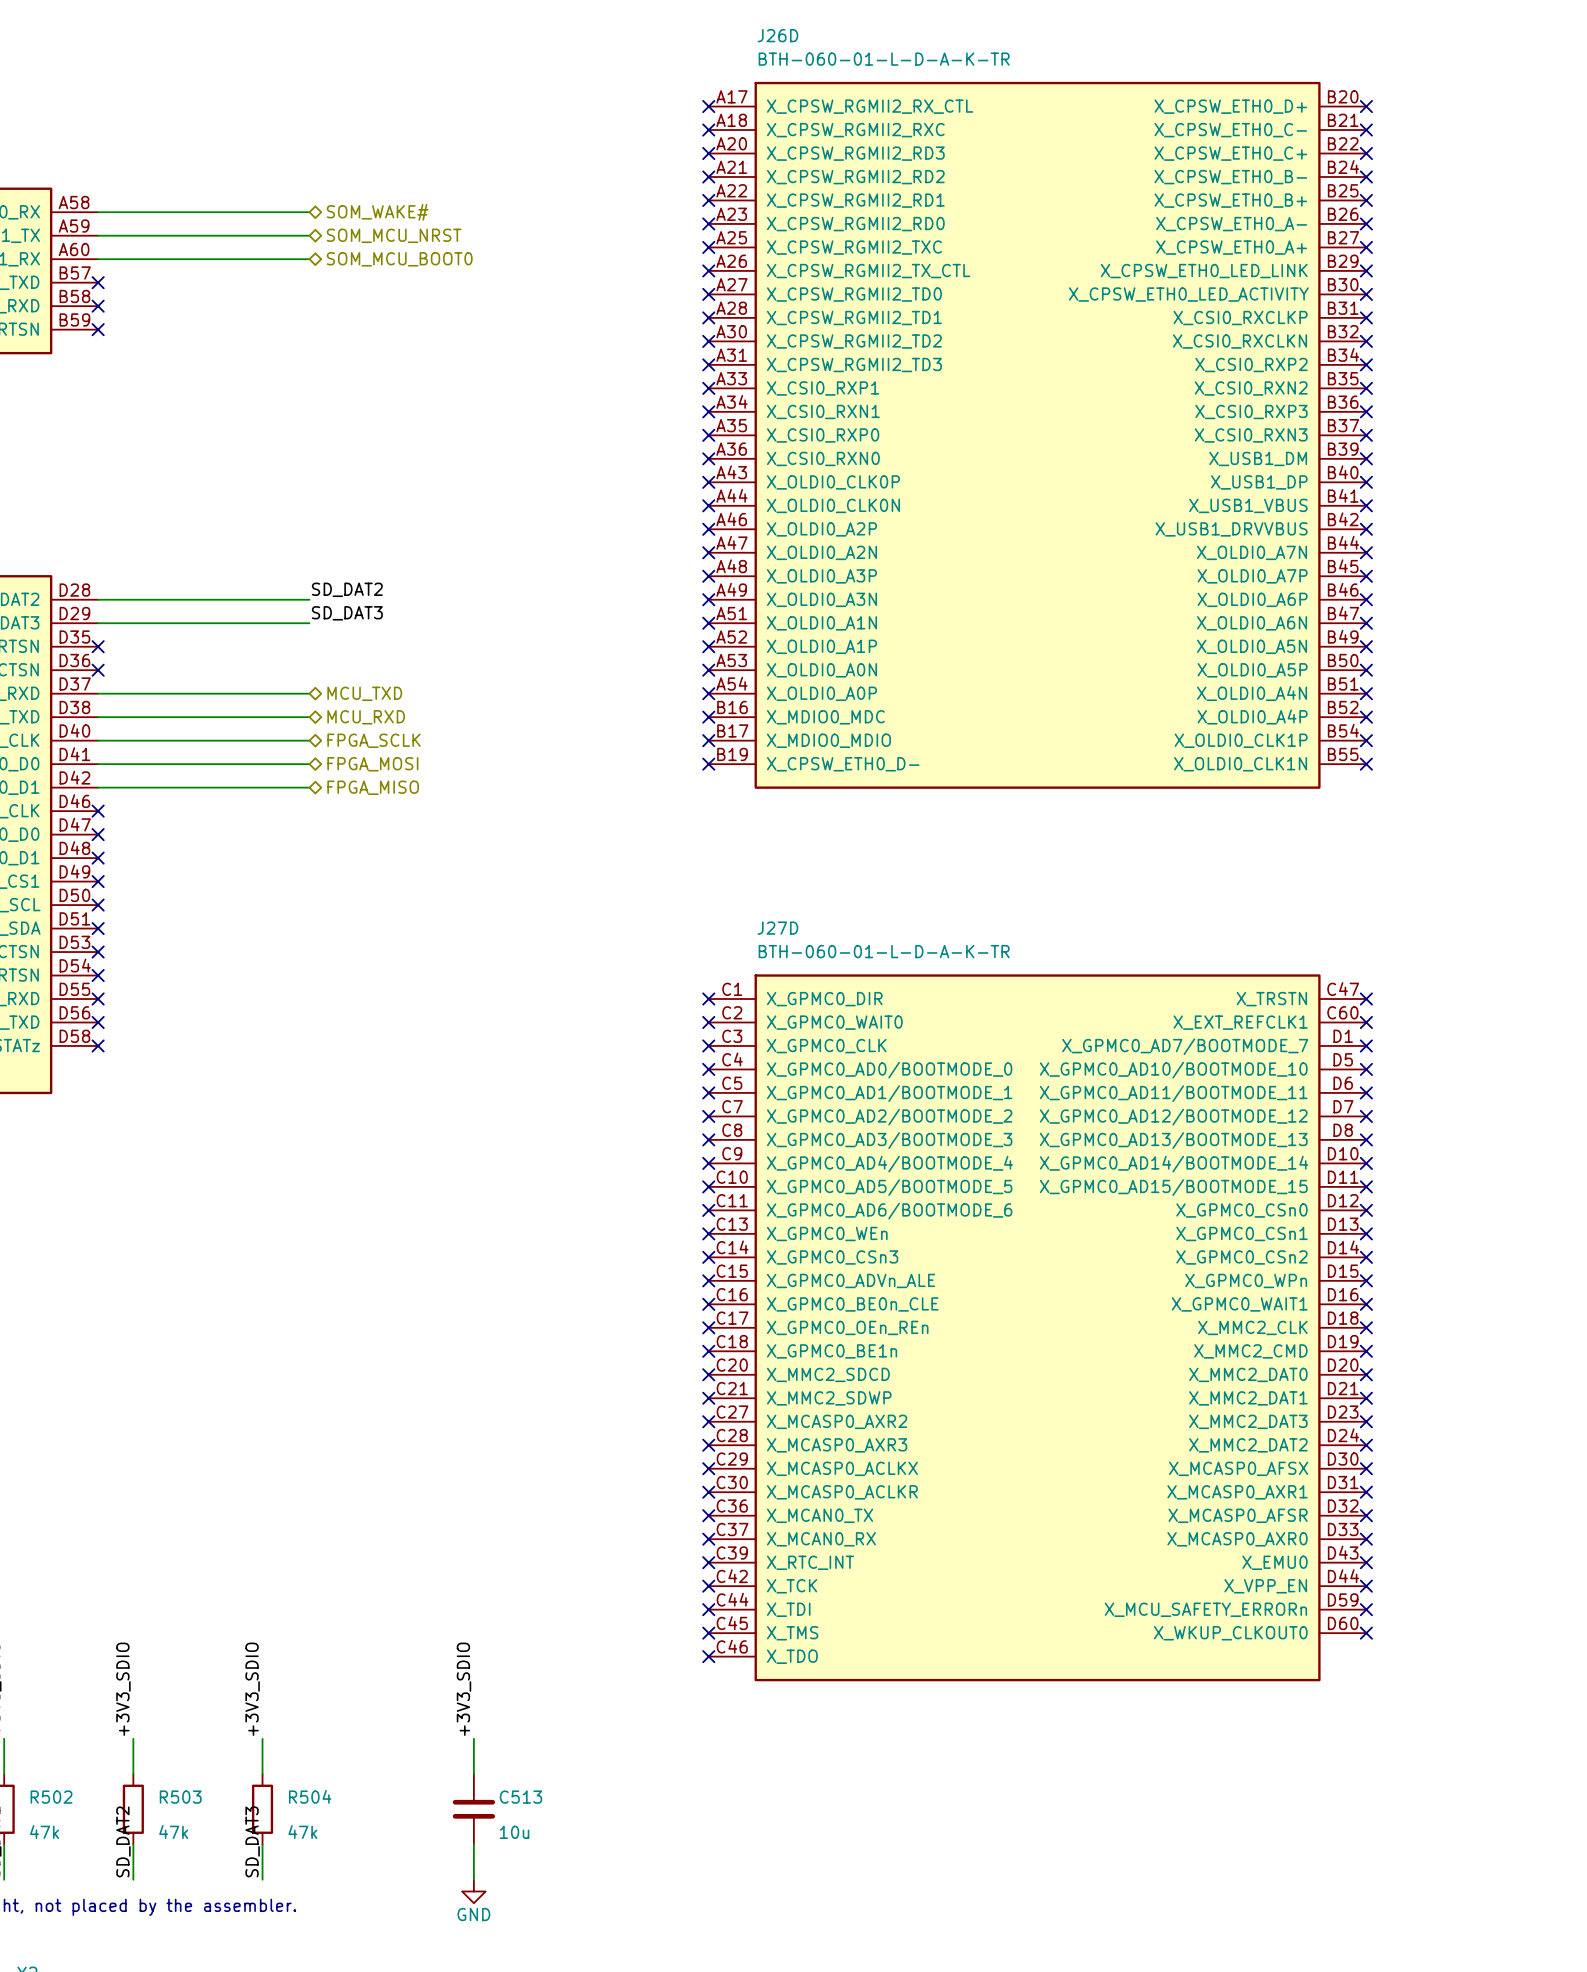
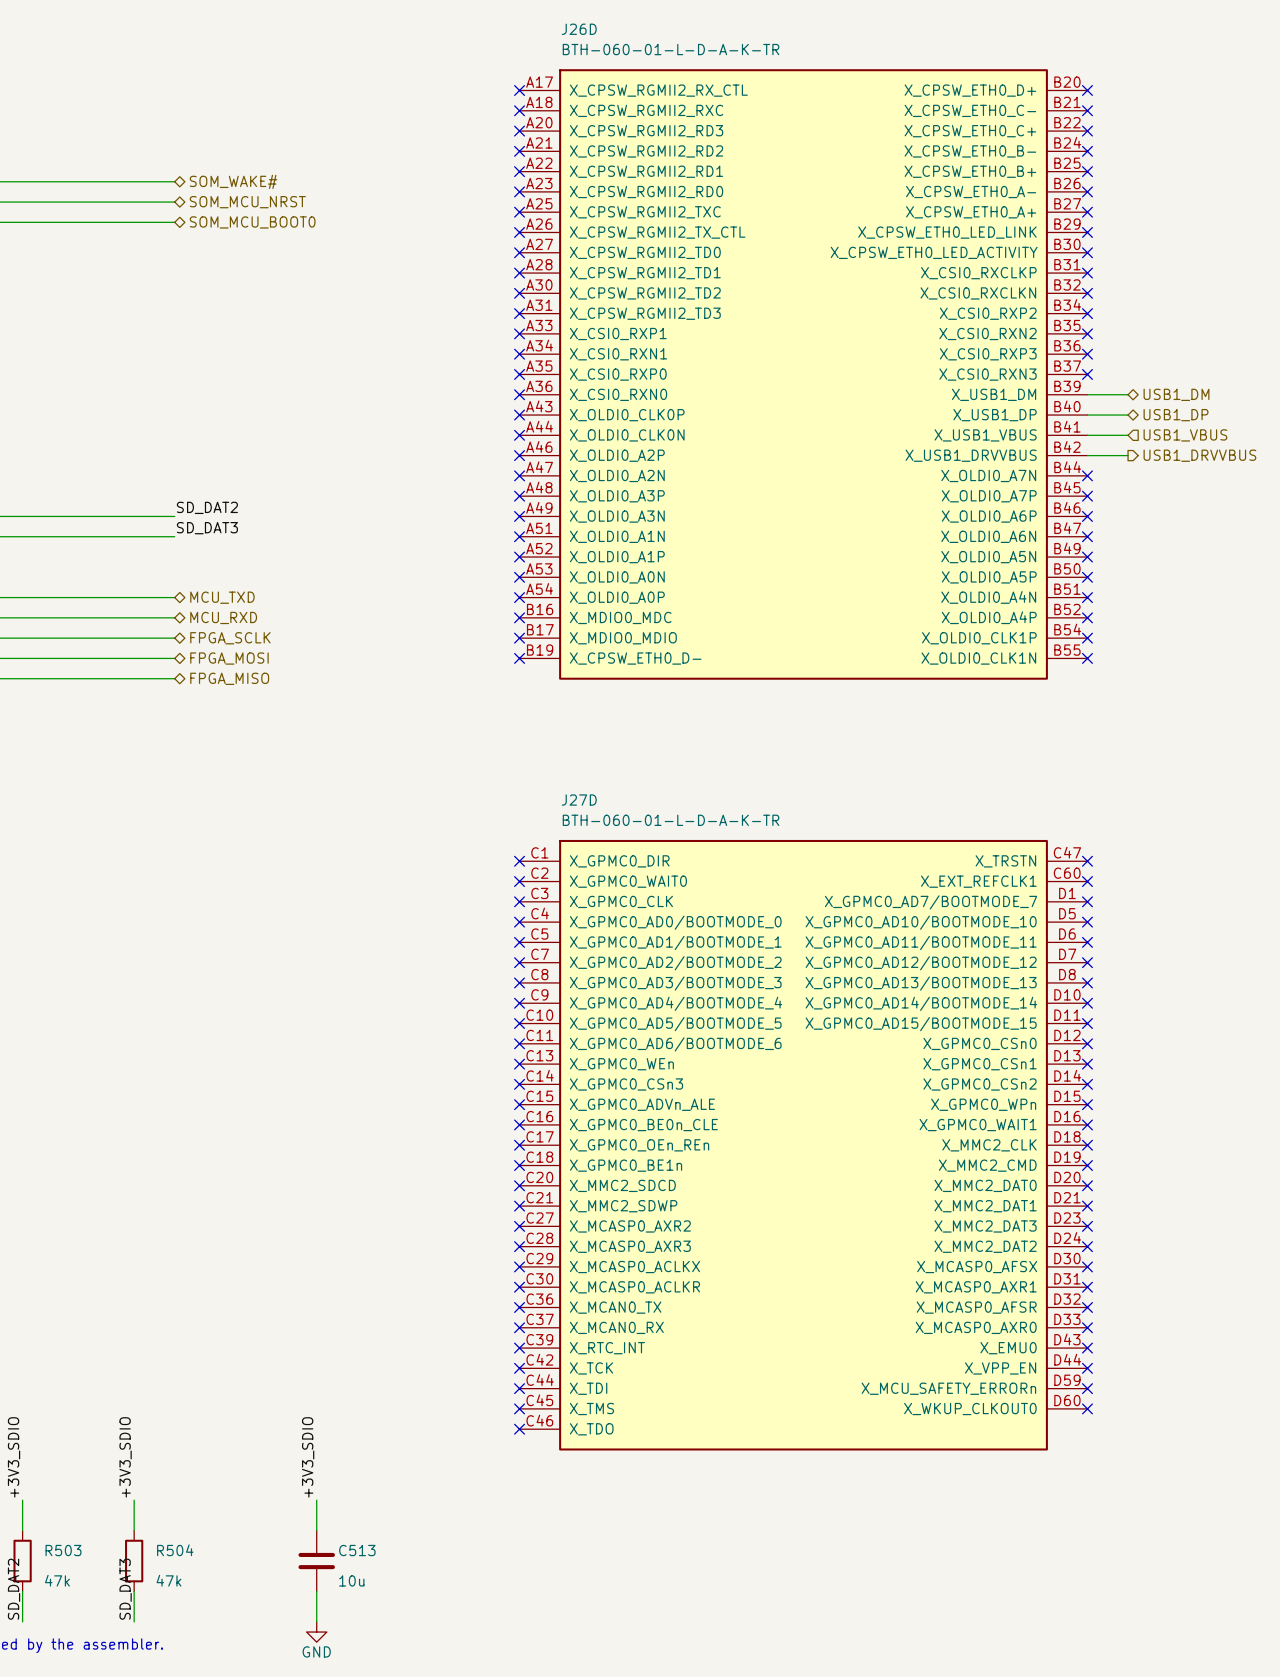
wire: none -> (1087, 394) (1128, 394)
no-connect mark: (1366, 458) -> none
hierarchical label: none -> USB1_DM (1176, 394)
wire: none -> (1087, 415) (1128, 415)
no-connect mark: (1366, 482) -> none
hierarchical label: none -> USB1_DP (1176, 415)
wire: none -> (1087, 435) (1128, 435)
no-connect mark: (1366, 505) -> none
hierarchical label: none -> USB1_VBUS (1185, 435)
wire: none -> (1087, 455) (1128, 455)
no-connect mark: (1366, 529) -> none
hierarchical label: none -> USB1_DRVVBUS (1199, 455)

